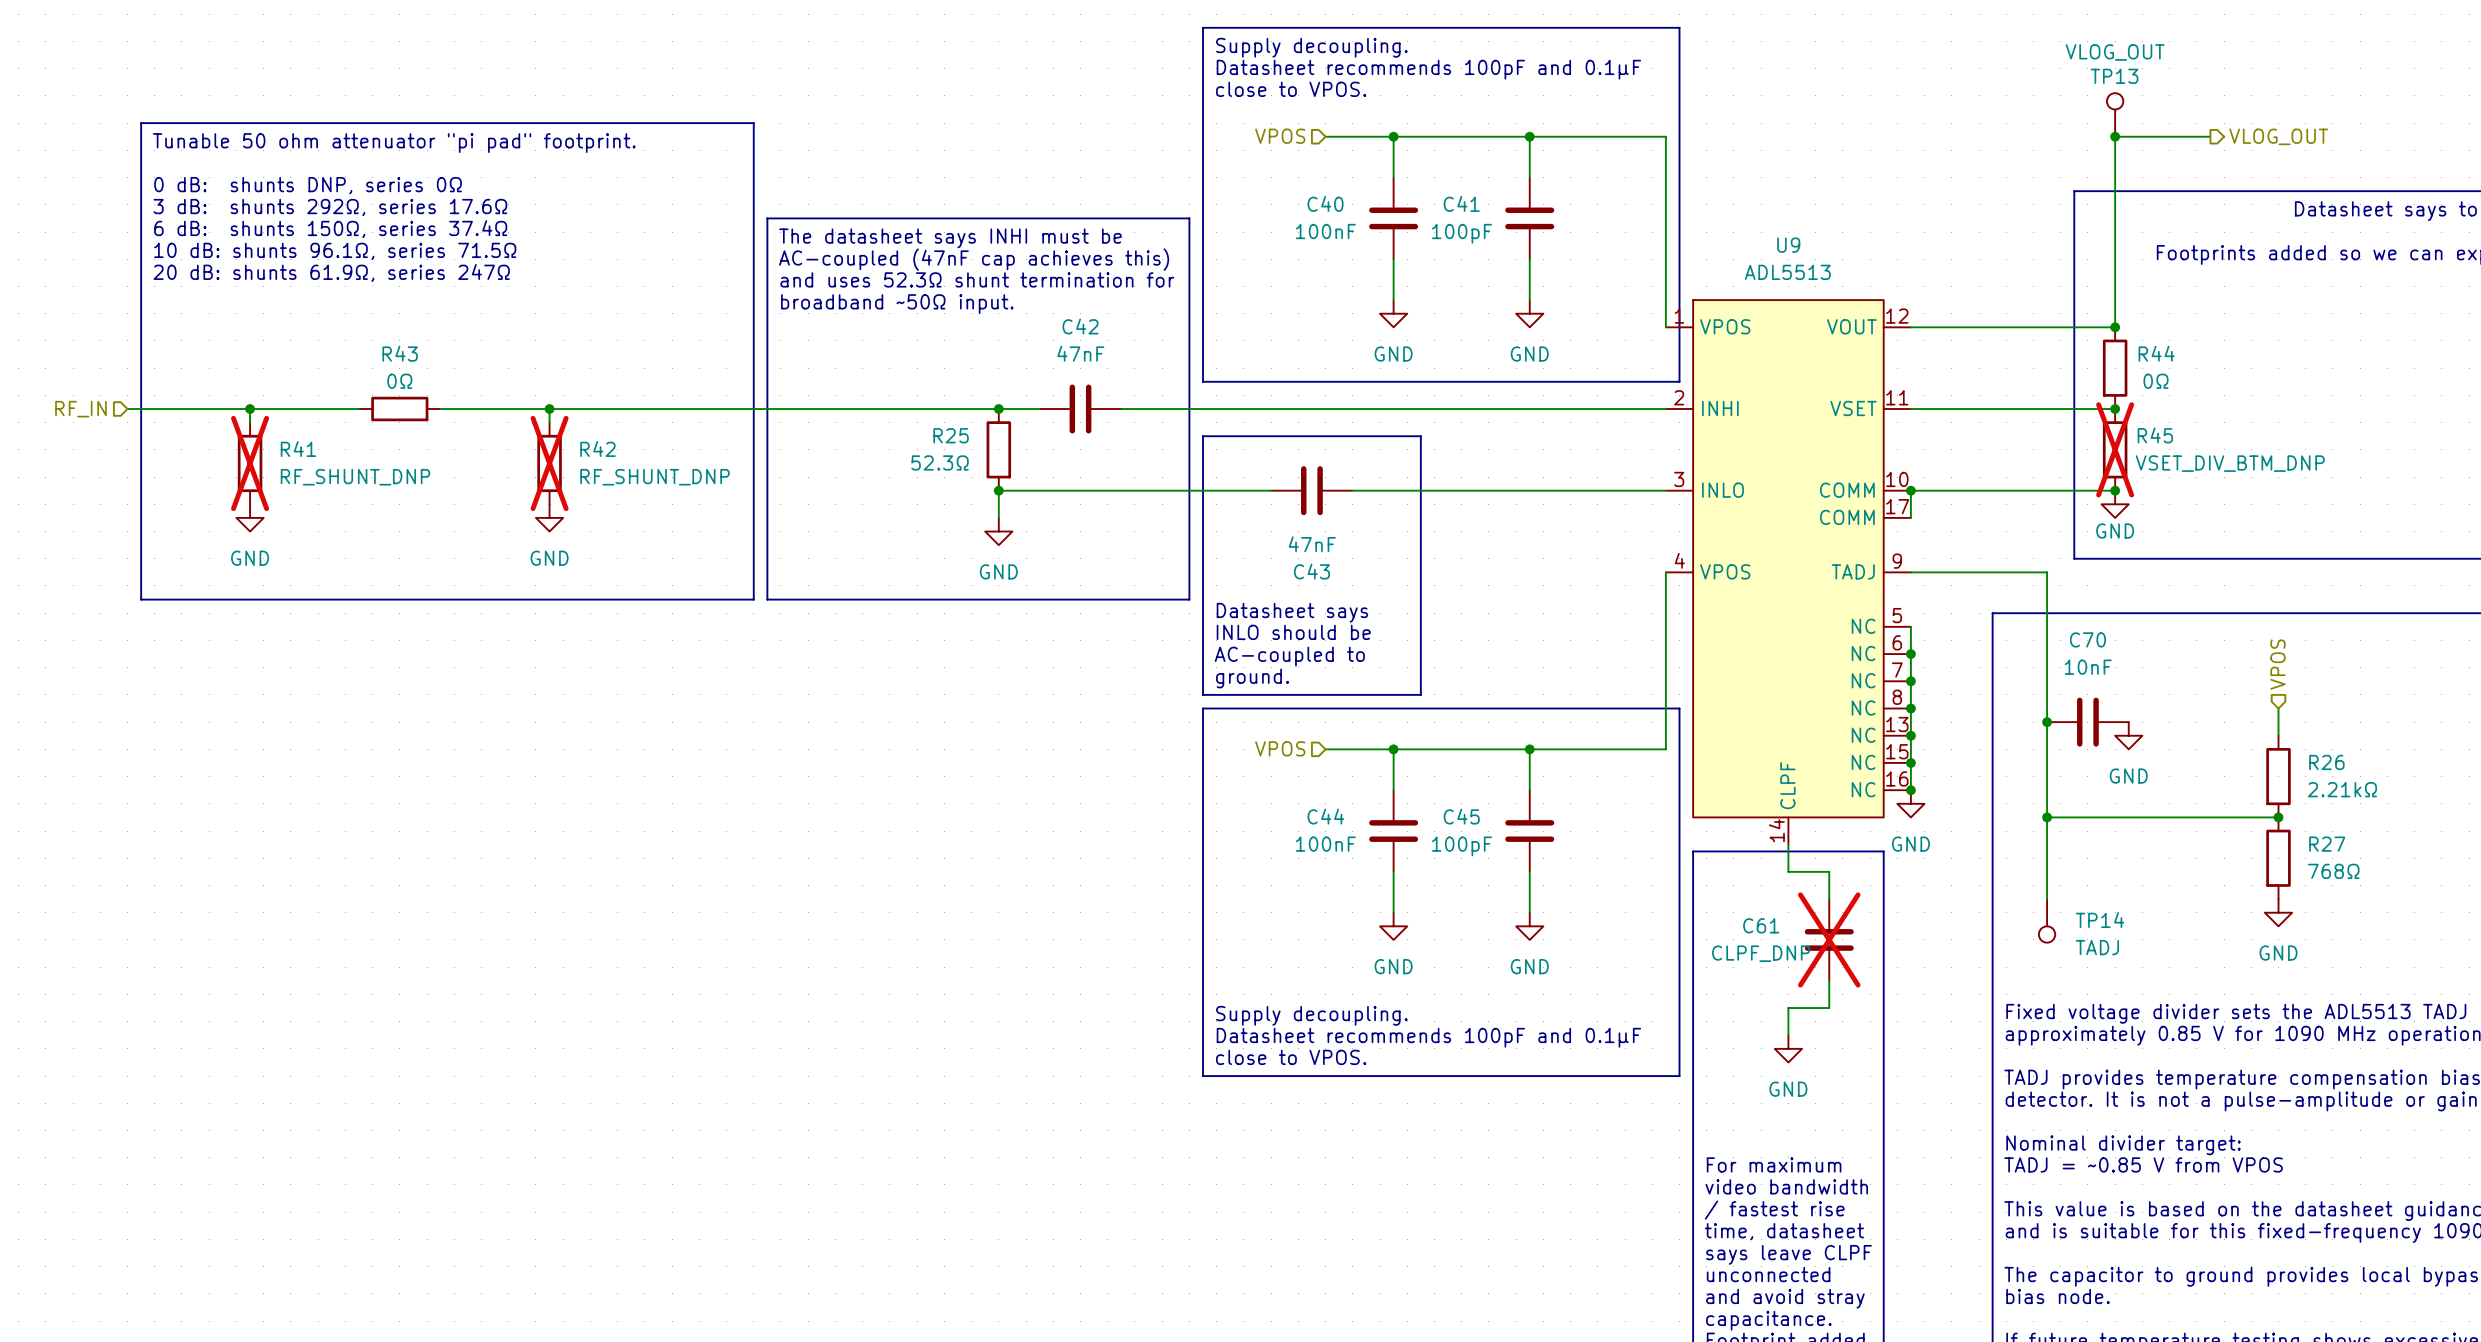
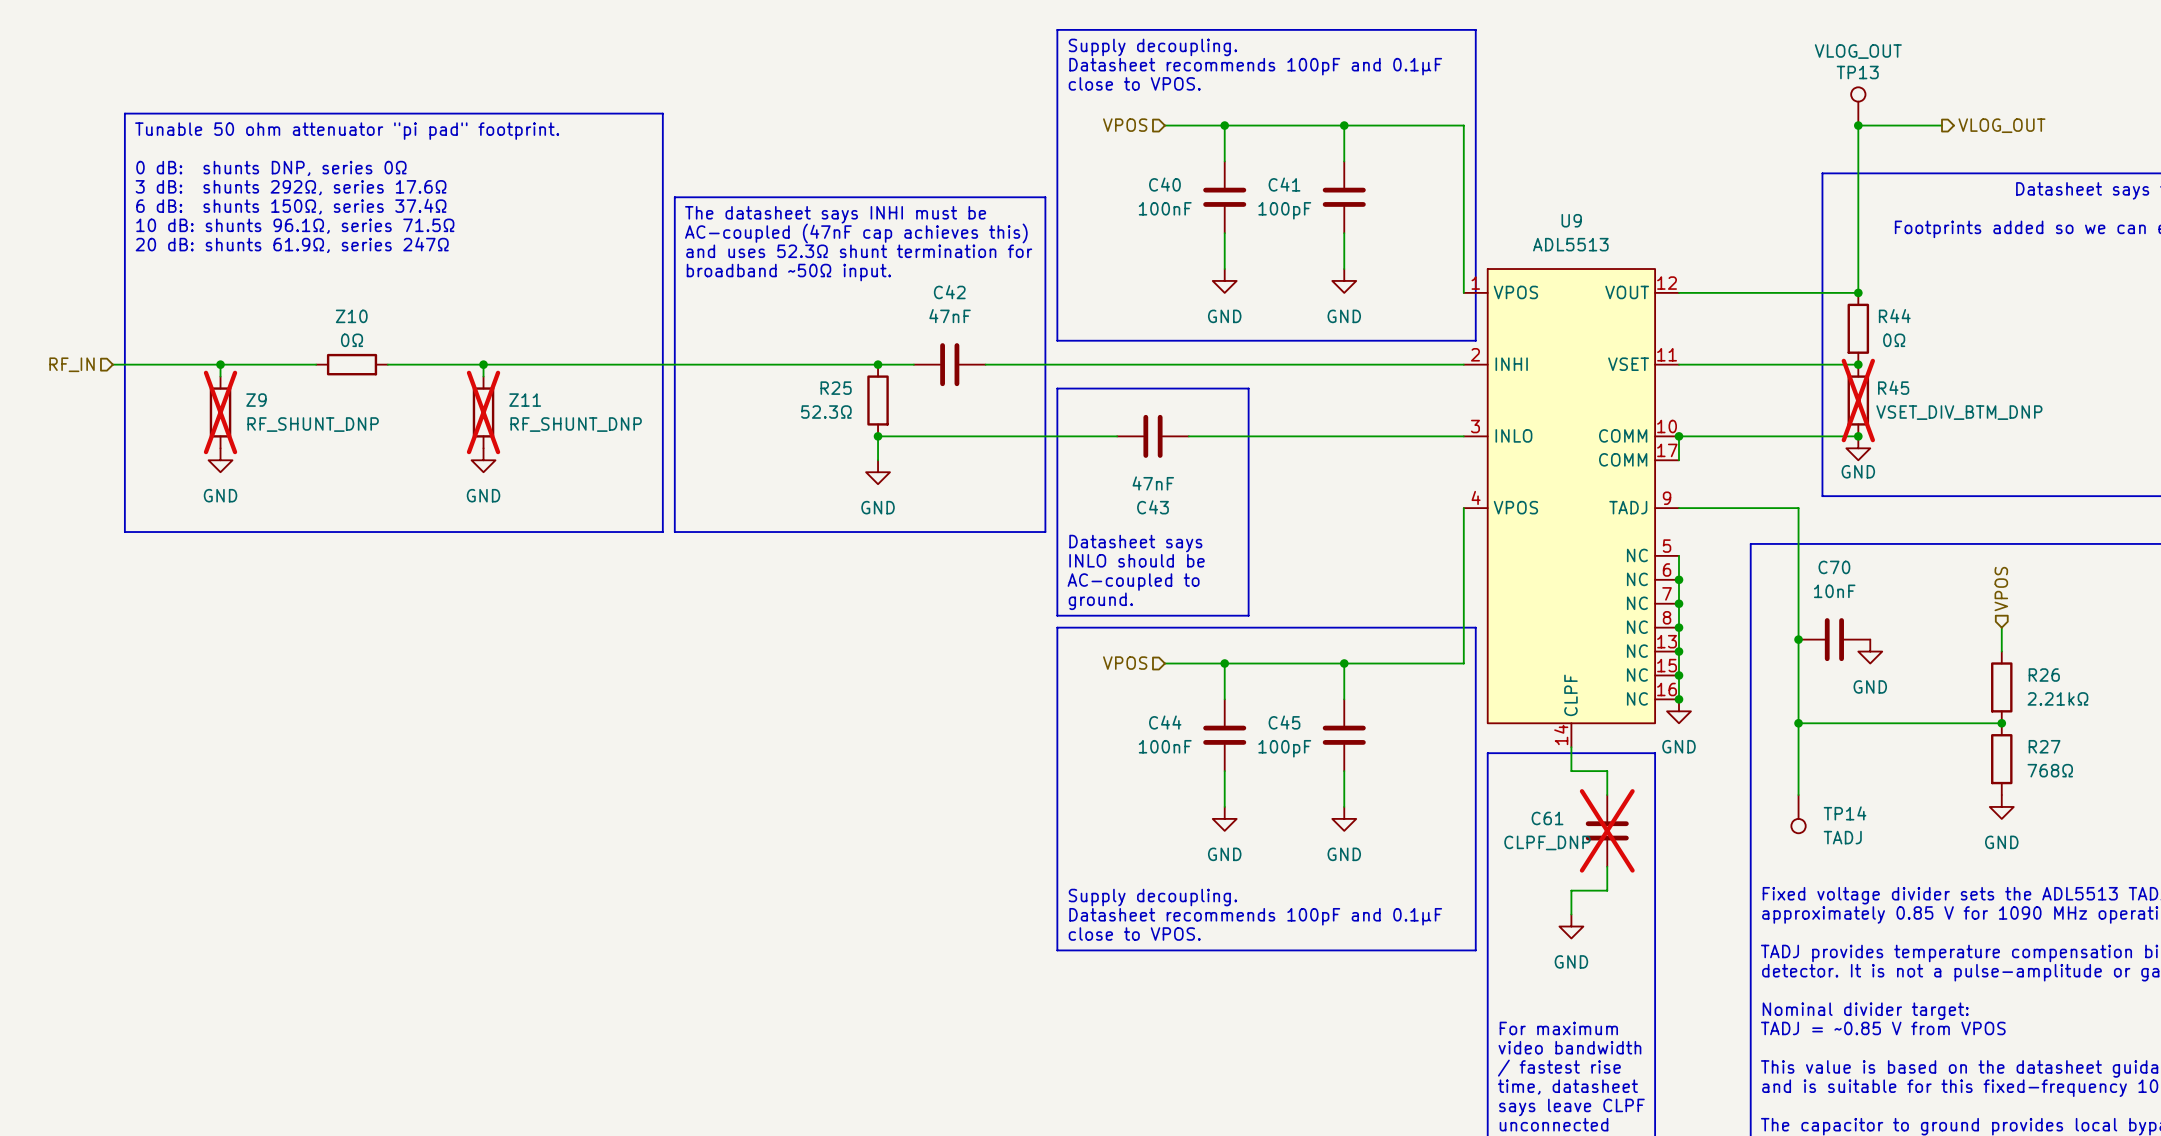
R43 name: R43 (400, 353) -> Z10 (351, 316)
R41 name: R41 (298, 449) -> Z9 (256, 400)
R42 name: R42 (597, 449) -> Z11 (525, 400)

